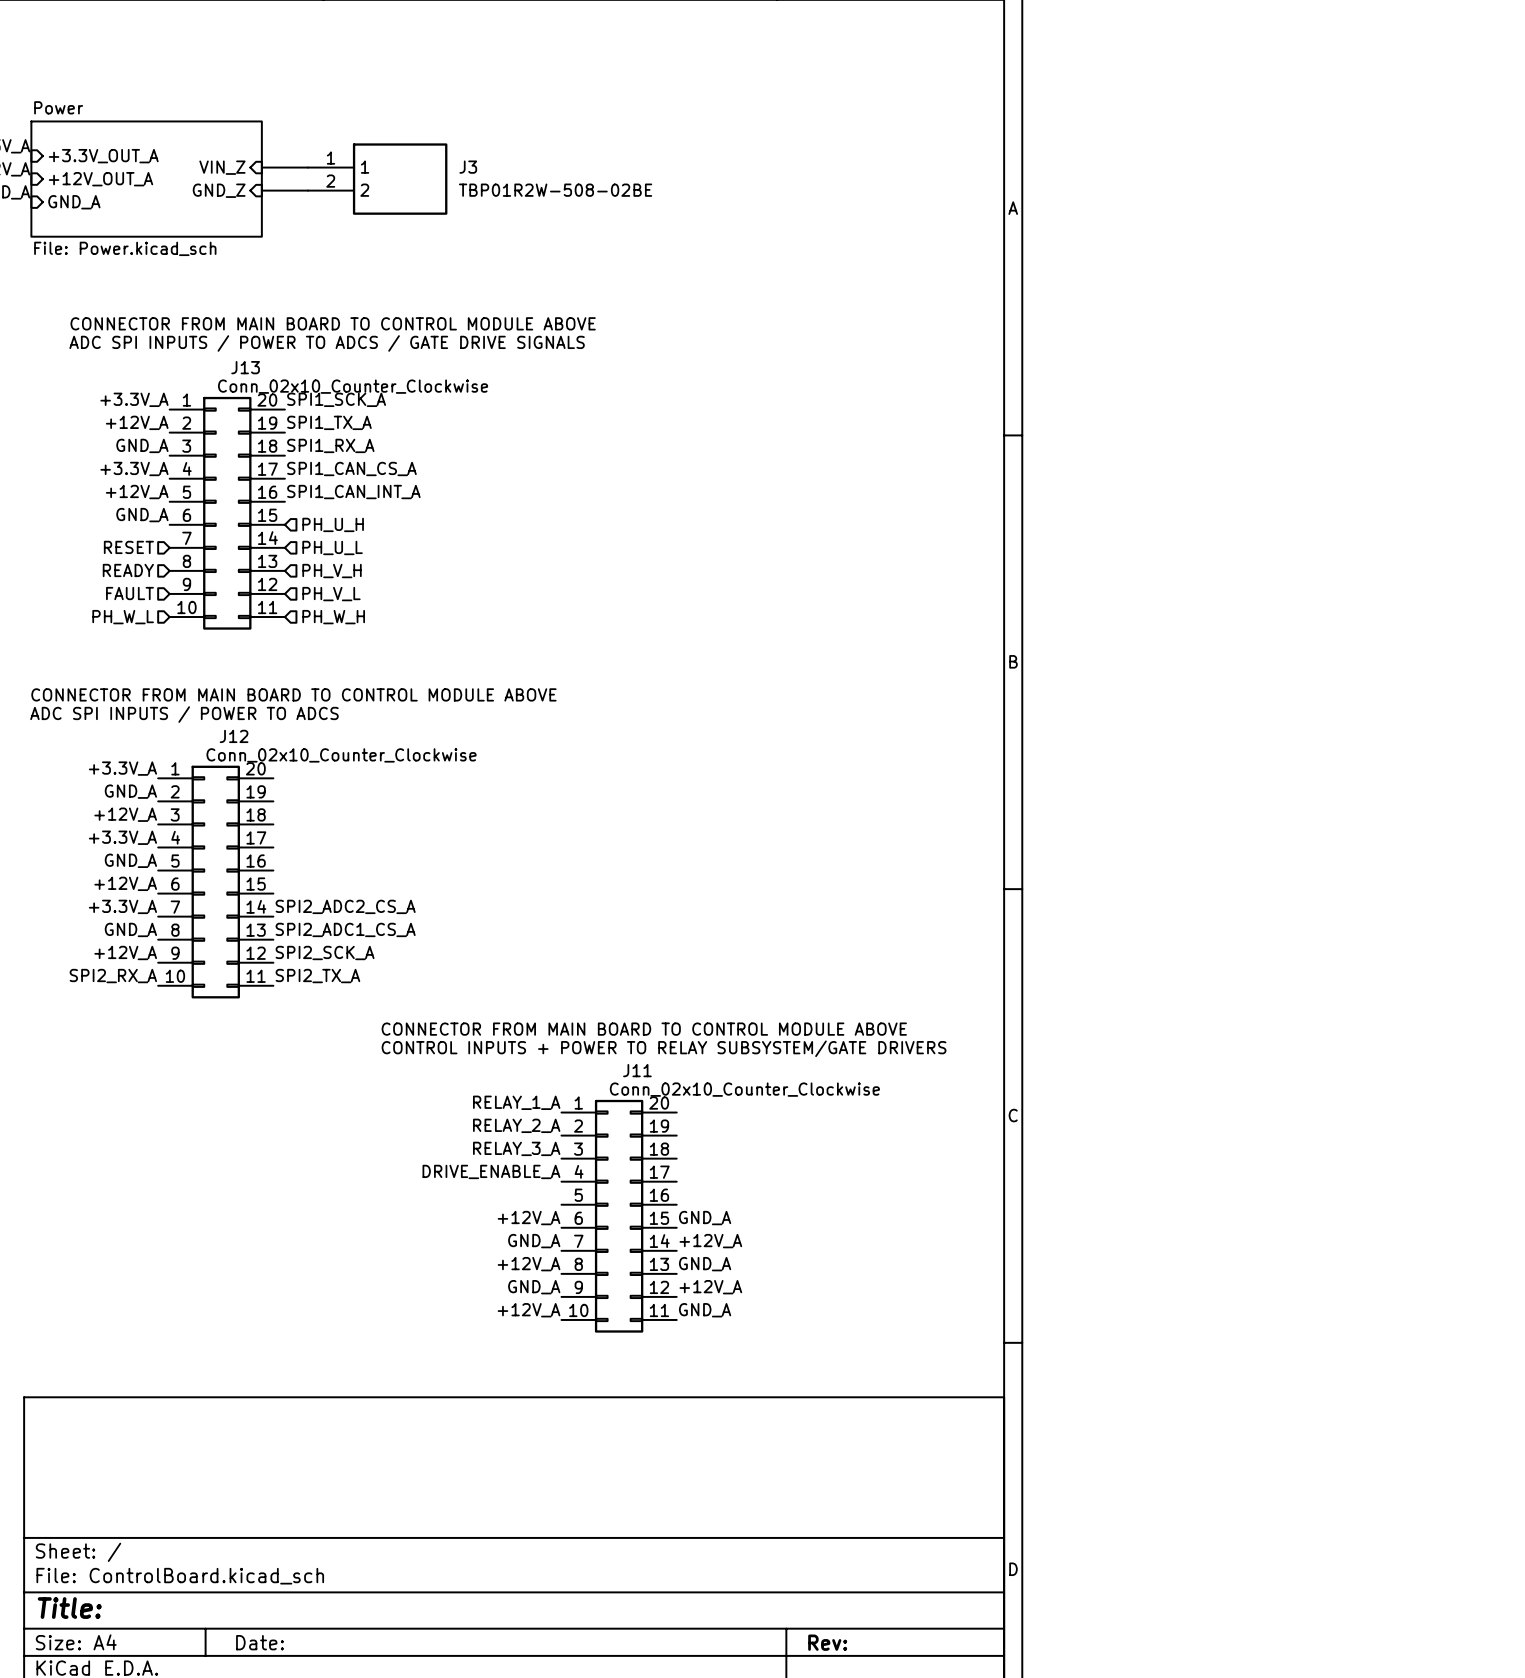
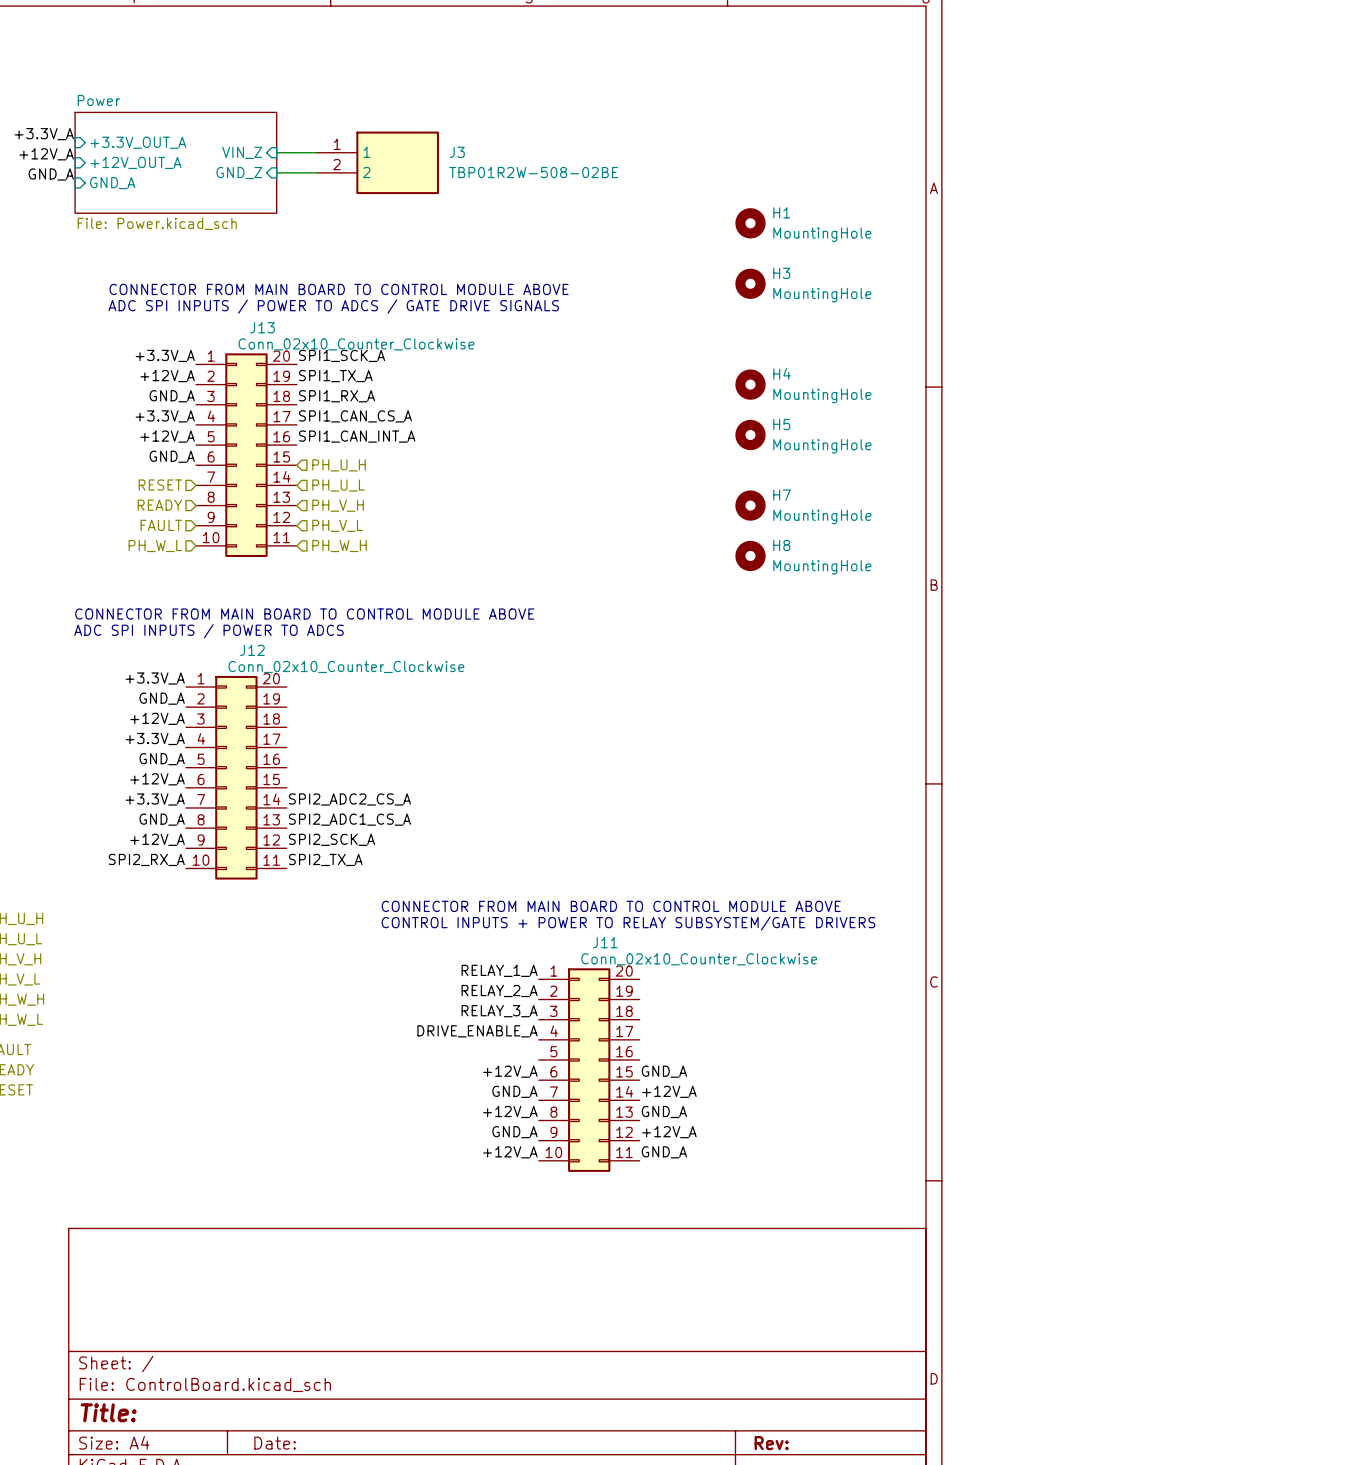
H1: none -> MountingHole (750, 223)
H3: none -> MountingHole (750, 283)
H4: none -> MountingHole (750, 384)
H5: none -> MountingHole (750, 435)
H7: none -> MountingHole (750, 505)
H8: none -> MountingHole (750, 555)

